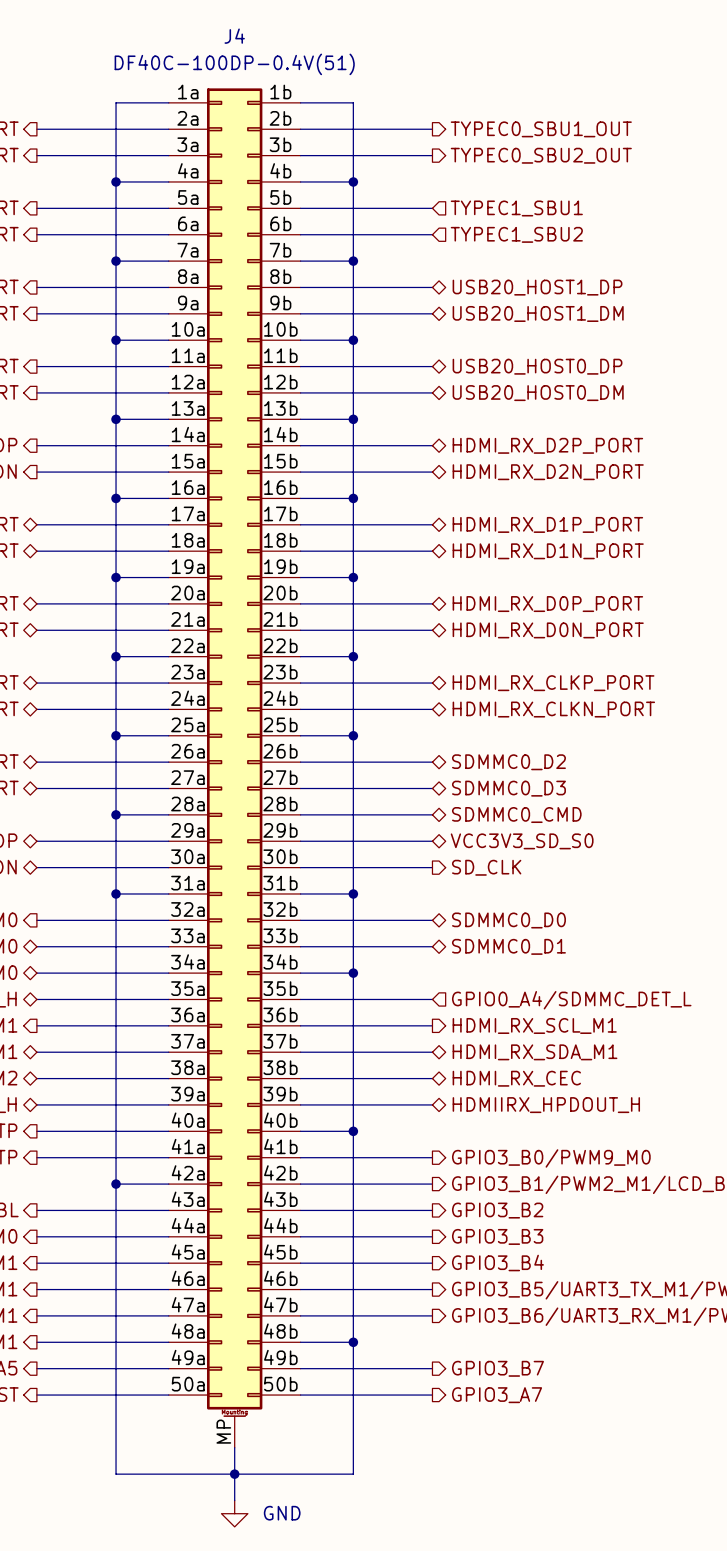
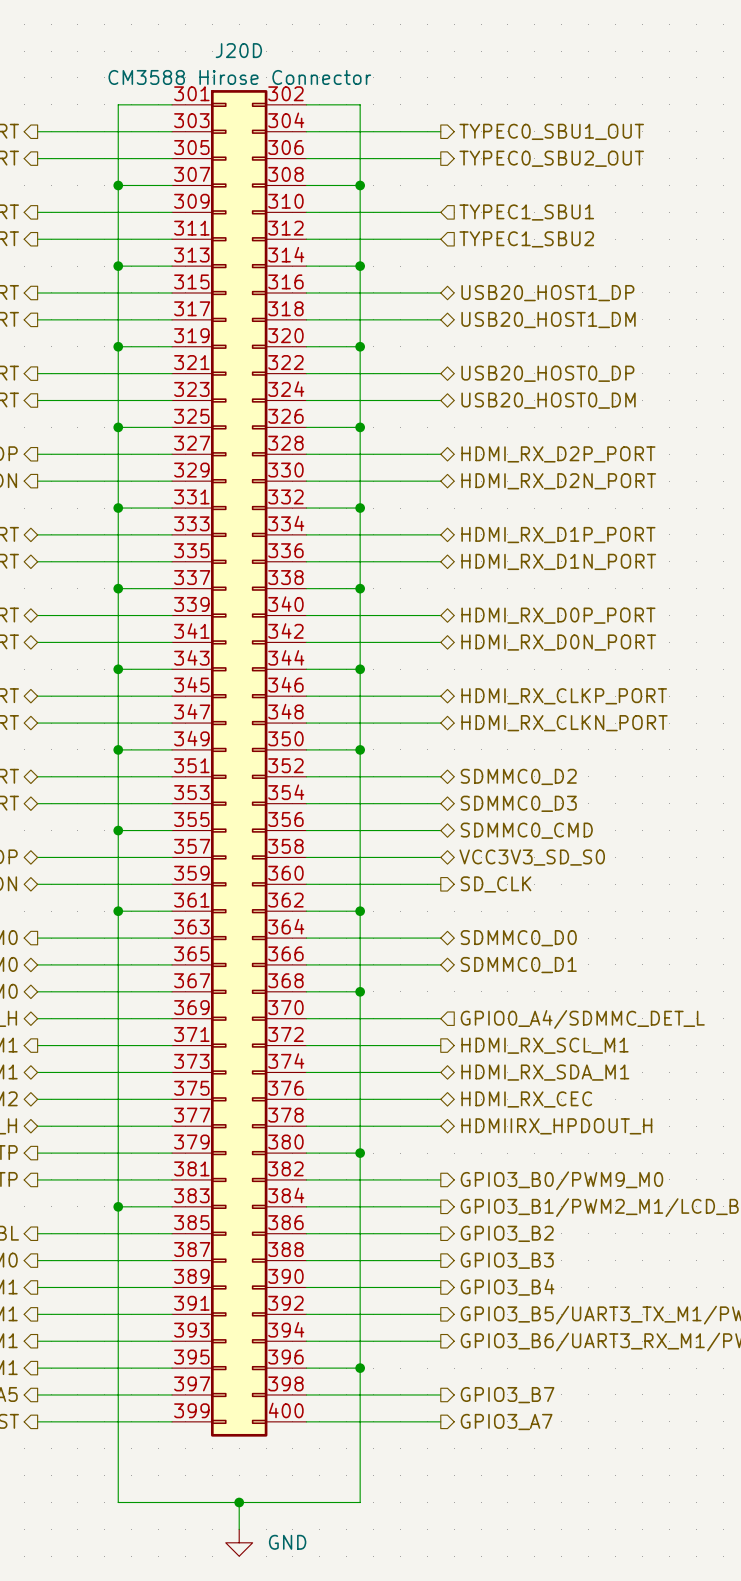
J20D: none -> CM3588 Hirose Connector (239, 763)
J4: DF40C-100DP-0.4V(51) (234, 768) -> none
wire: (234, 1447) (234, 1474) -> none

